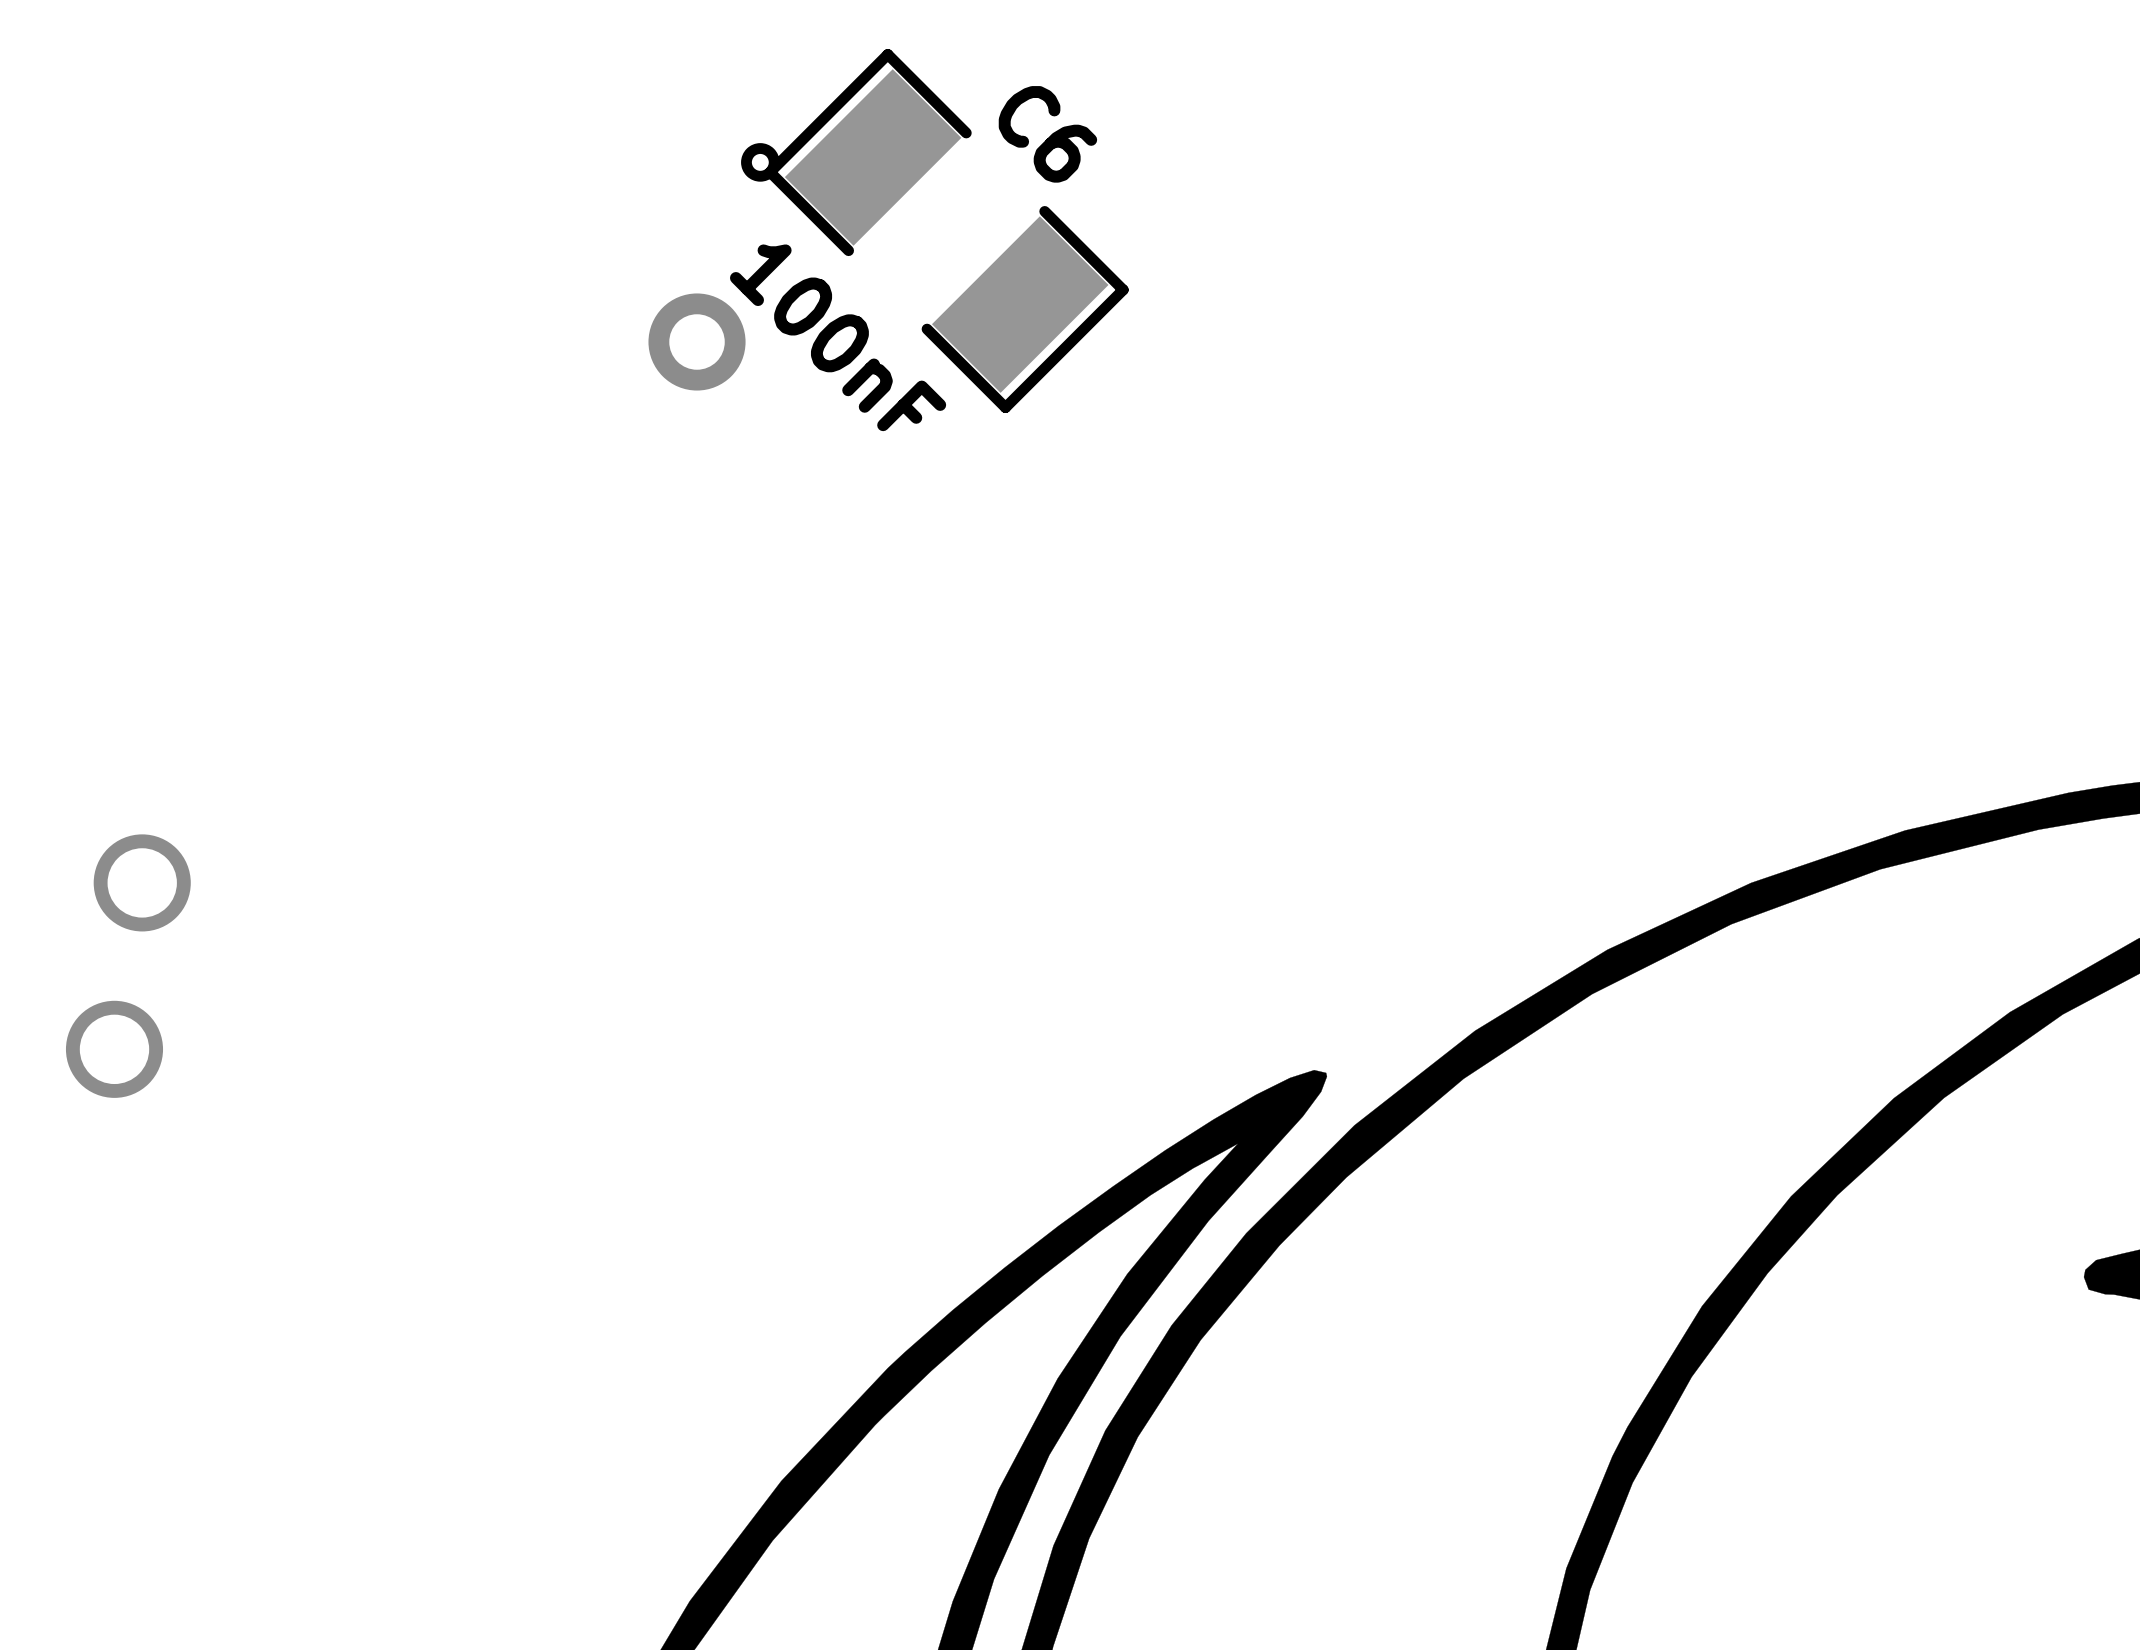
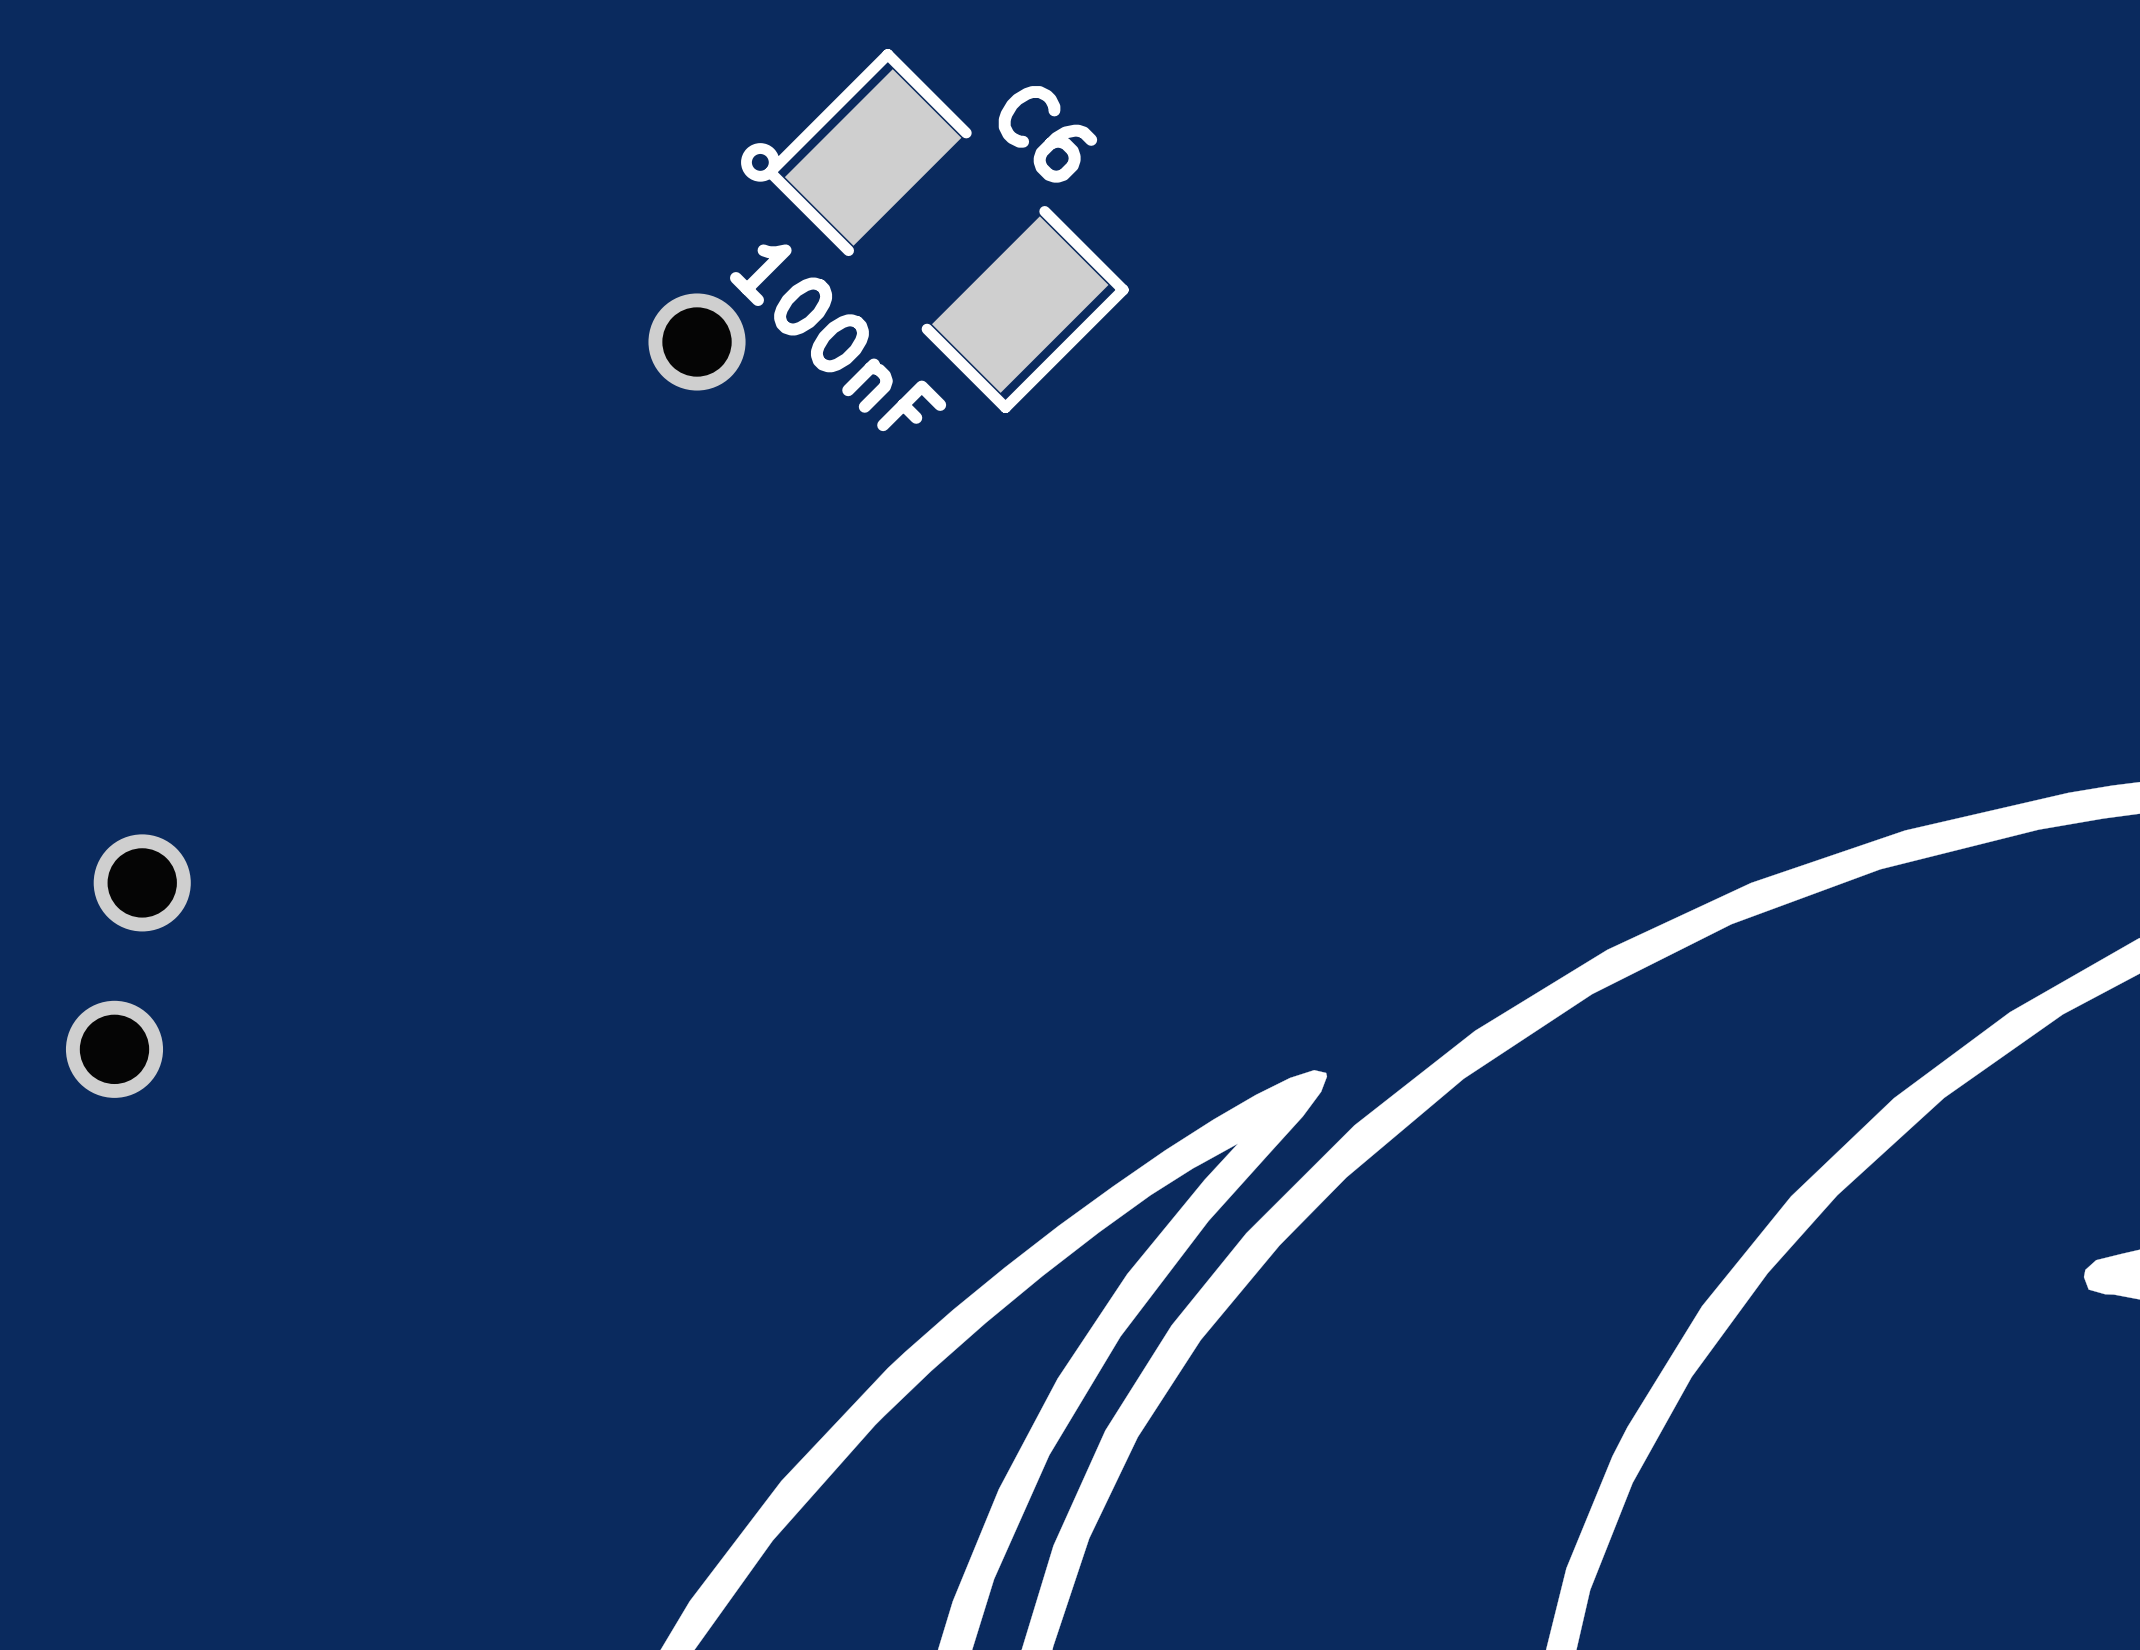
part footprint: [648, 293, 746, 391] -> [648, 293, 746, 391]

